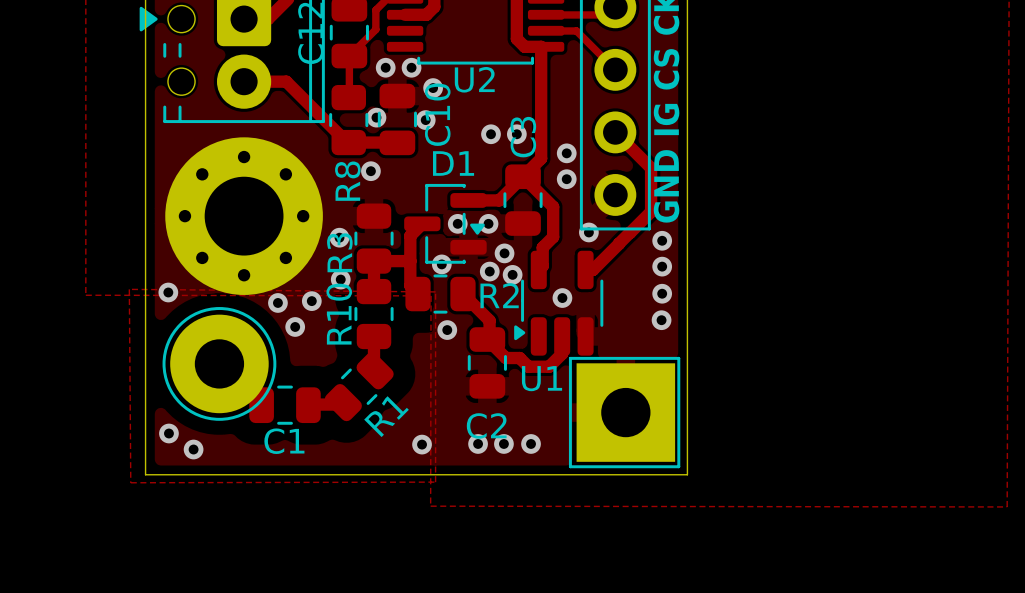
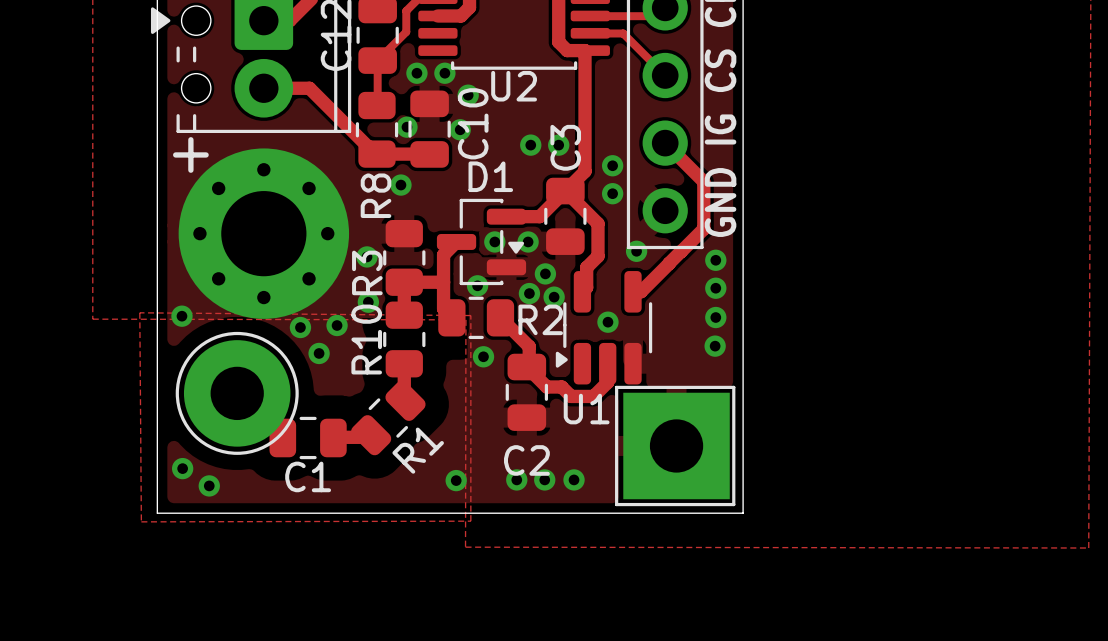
text: none -> + (190, 154)

